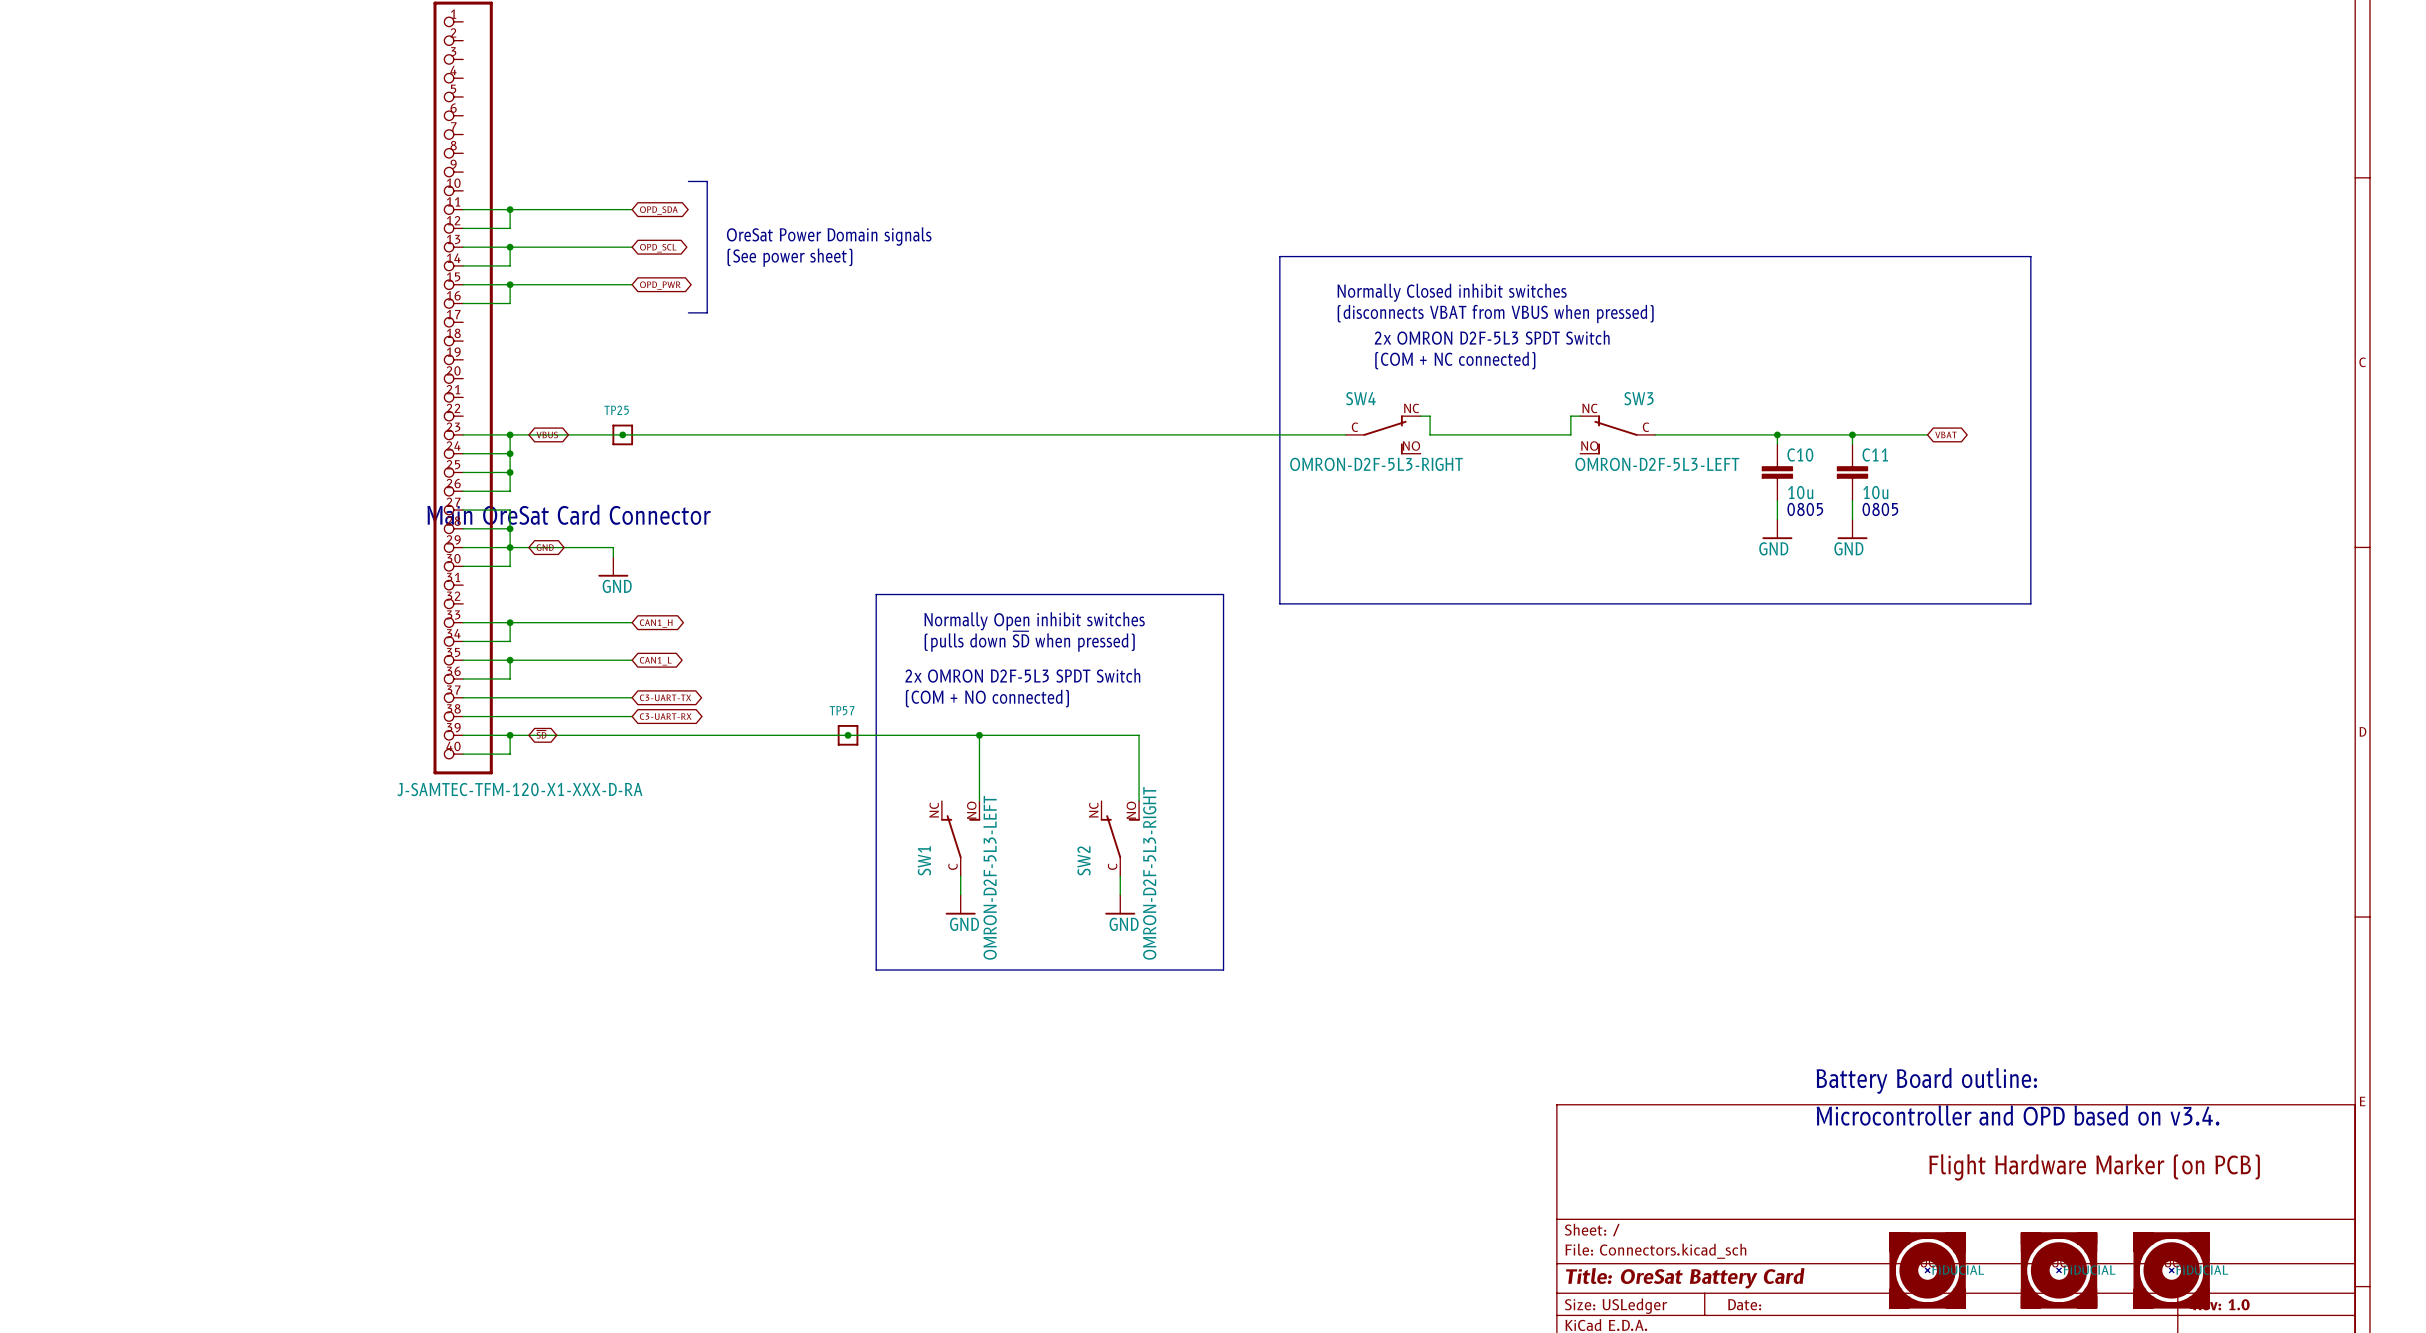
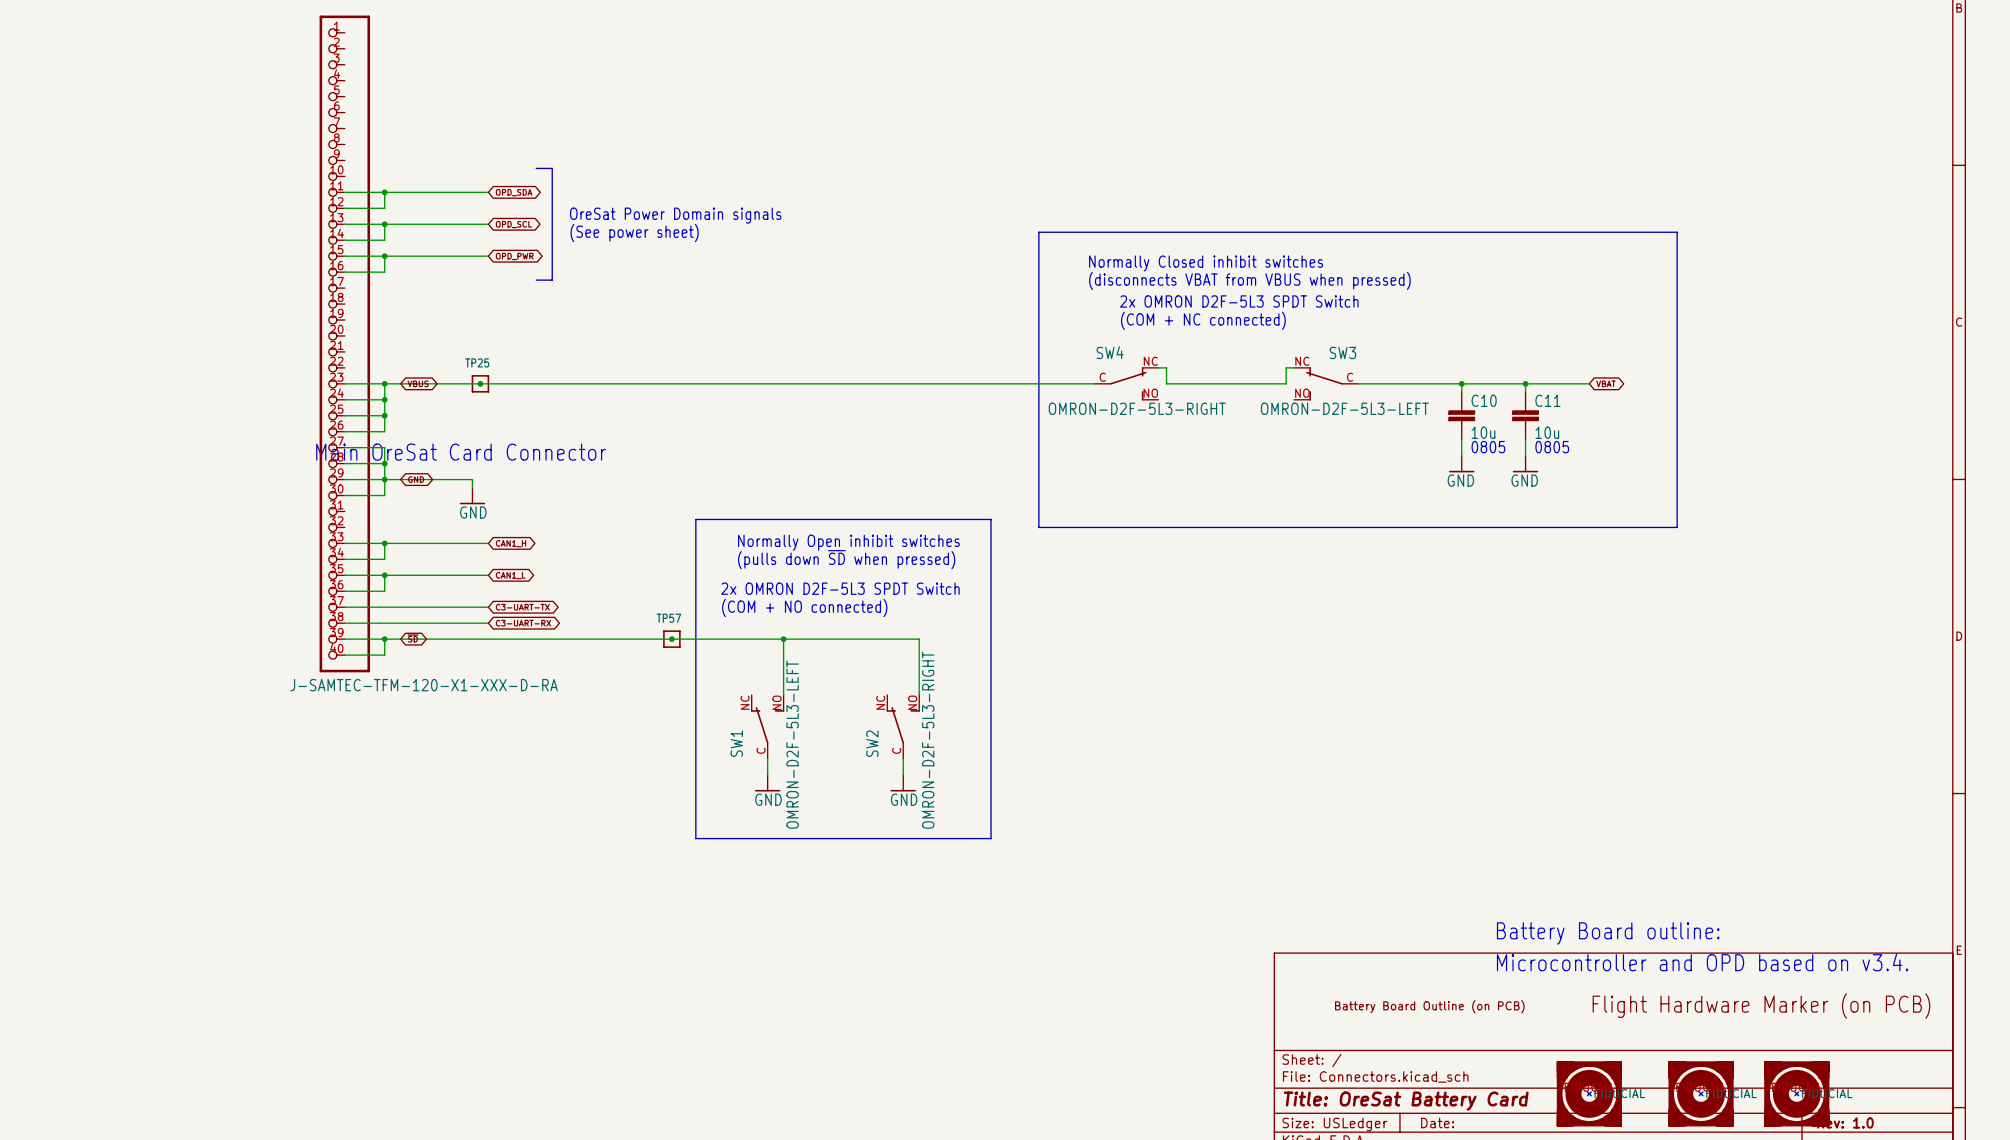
part: none -> (1429, 1006)

